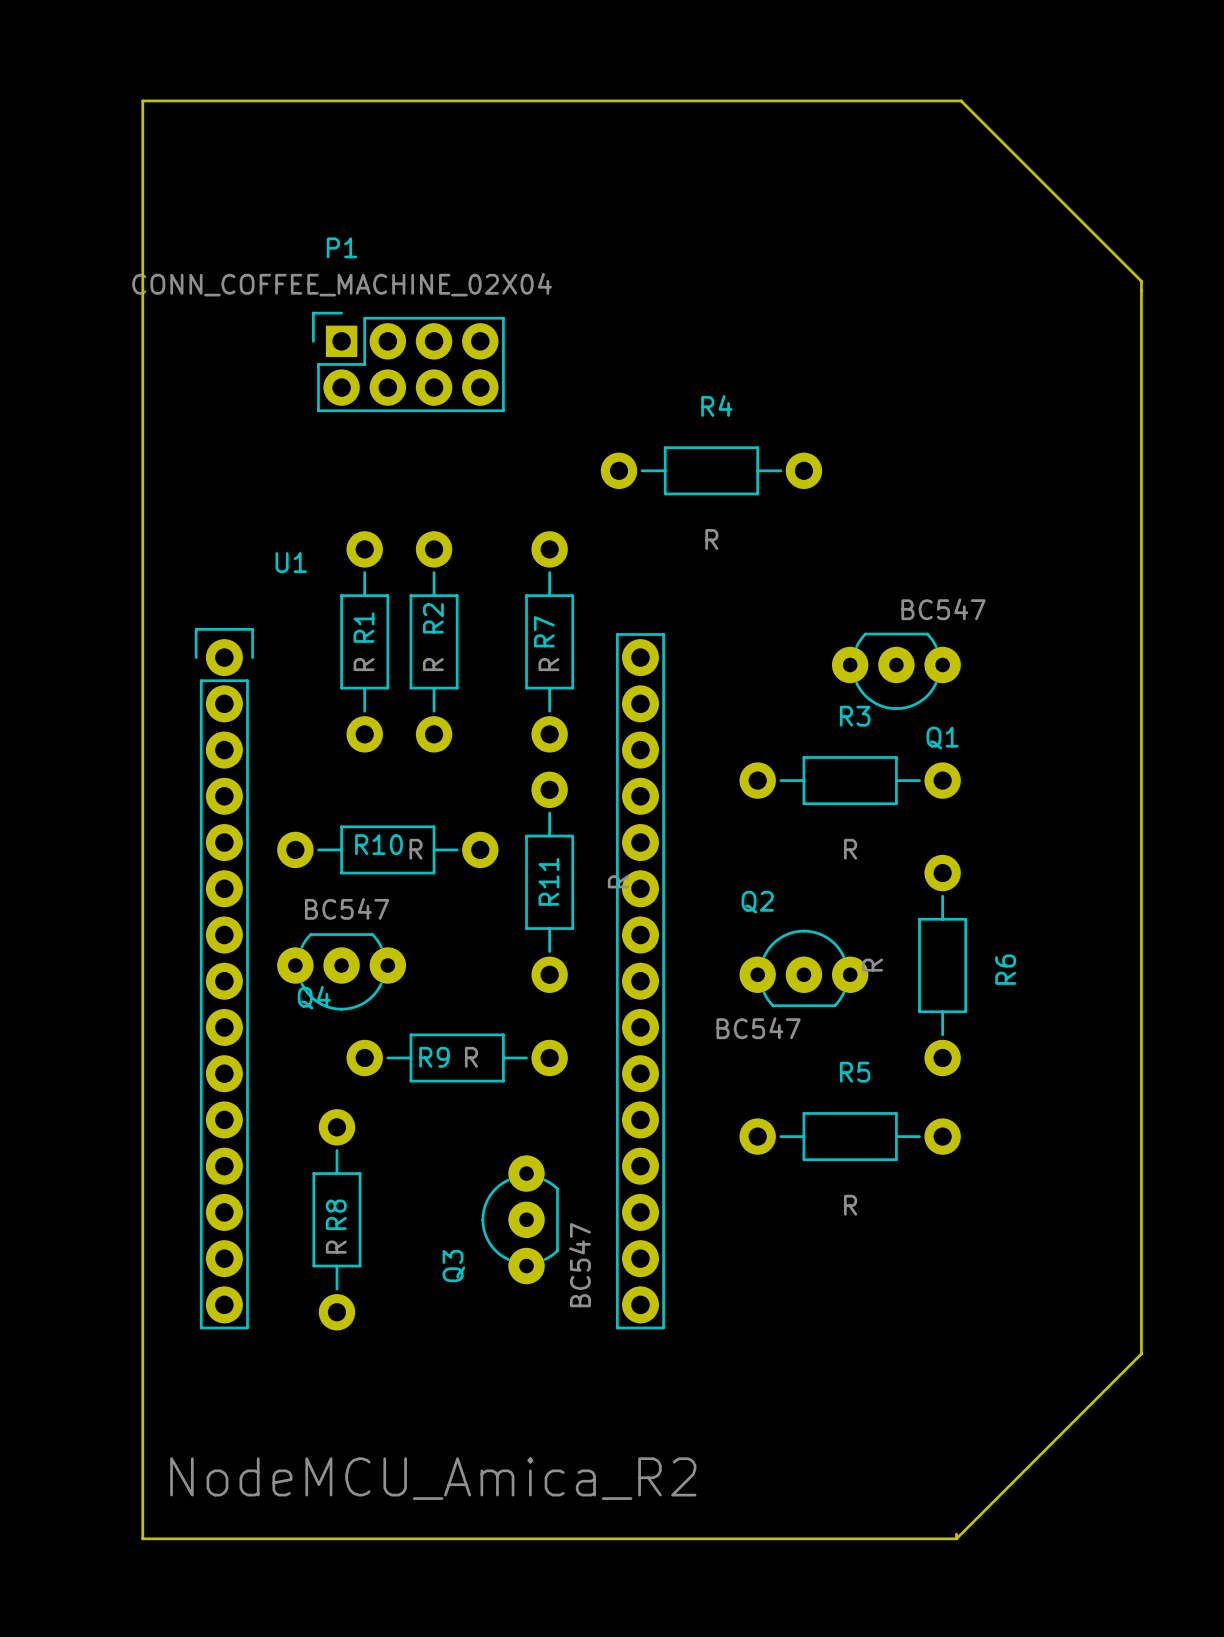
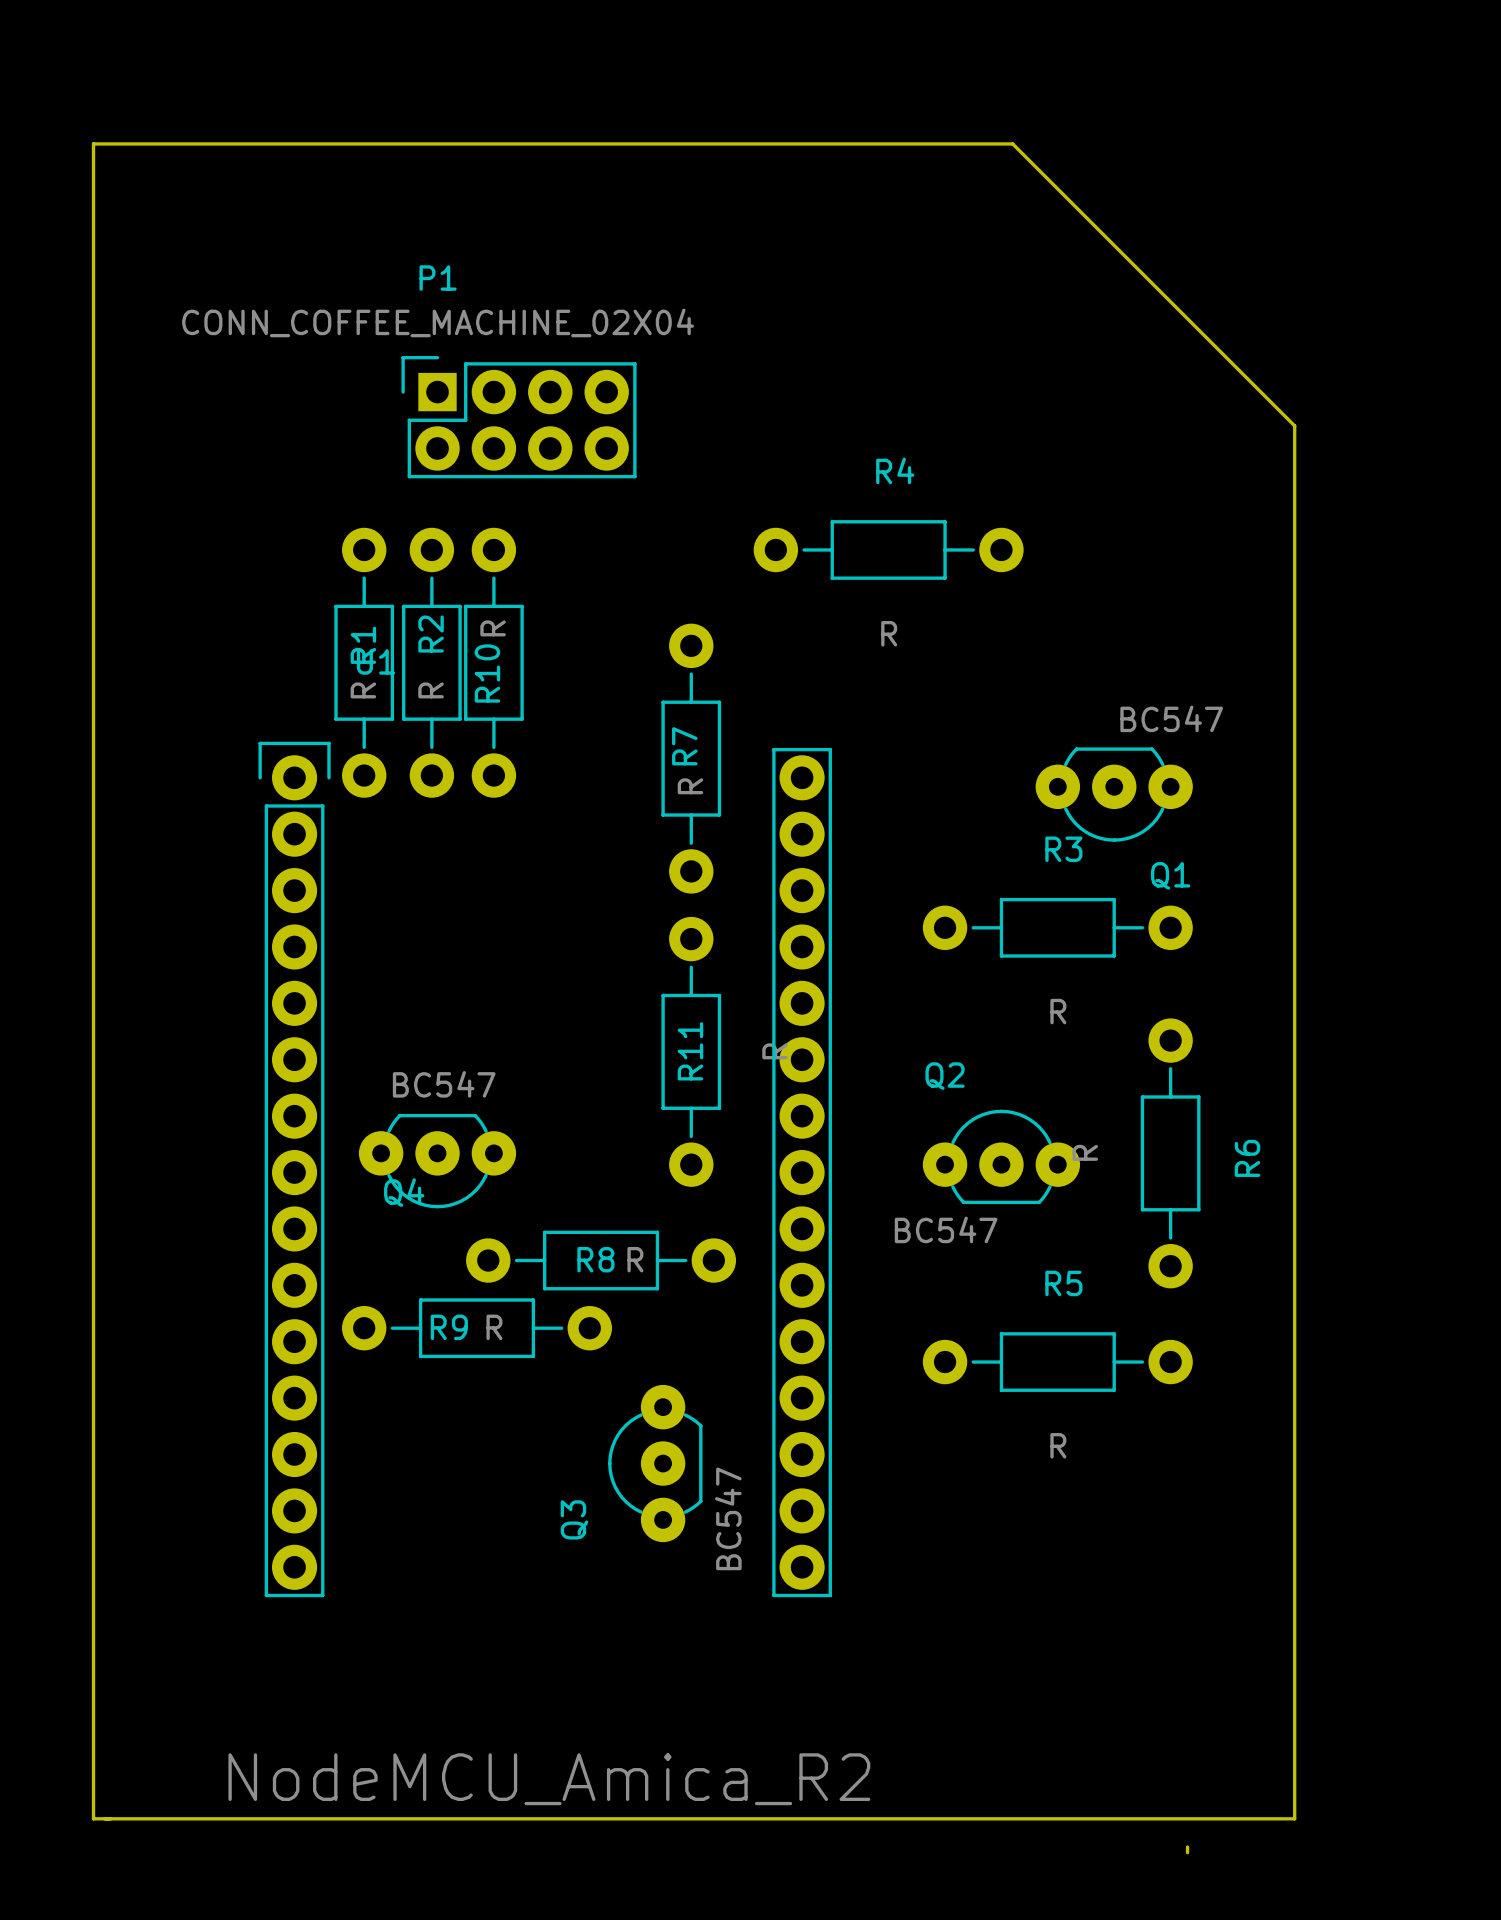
board edge: (142, 100) (142, 1538) (956, 1538) (1141, 1353) (1141, 281) (961, 100) (142, 100) -> (93, 143) (93, 1818) (1294, 1818) (1294, 425) (1012, 143) (93, 143)
R1 position: (364, 641) -> (364, 662)
R2 position: (434, 641) -> (431, 662)
R10 rotation: 0° (387, 849) -> 90° clockwise (493, 662)
R10 position: (387, 849) -> (493, 662)
R10 value position: R (415, 849) -> R (493, 628)
R9 position: (457, 1057) -> (476, 1328)
R8 rotation: 0° (336, 1219) -> 90° clockwise (601, 1260)
R8 position: (336, 1219) -> (601, 1260)
R8 value position: R (336, 1247) -> R (635, 1259)

